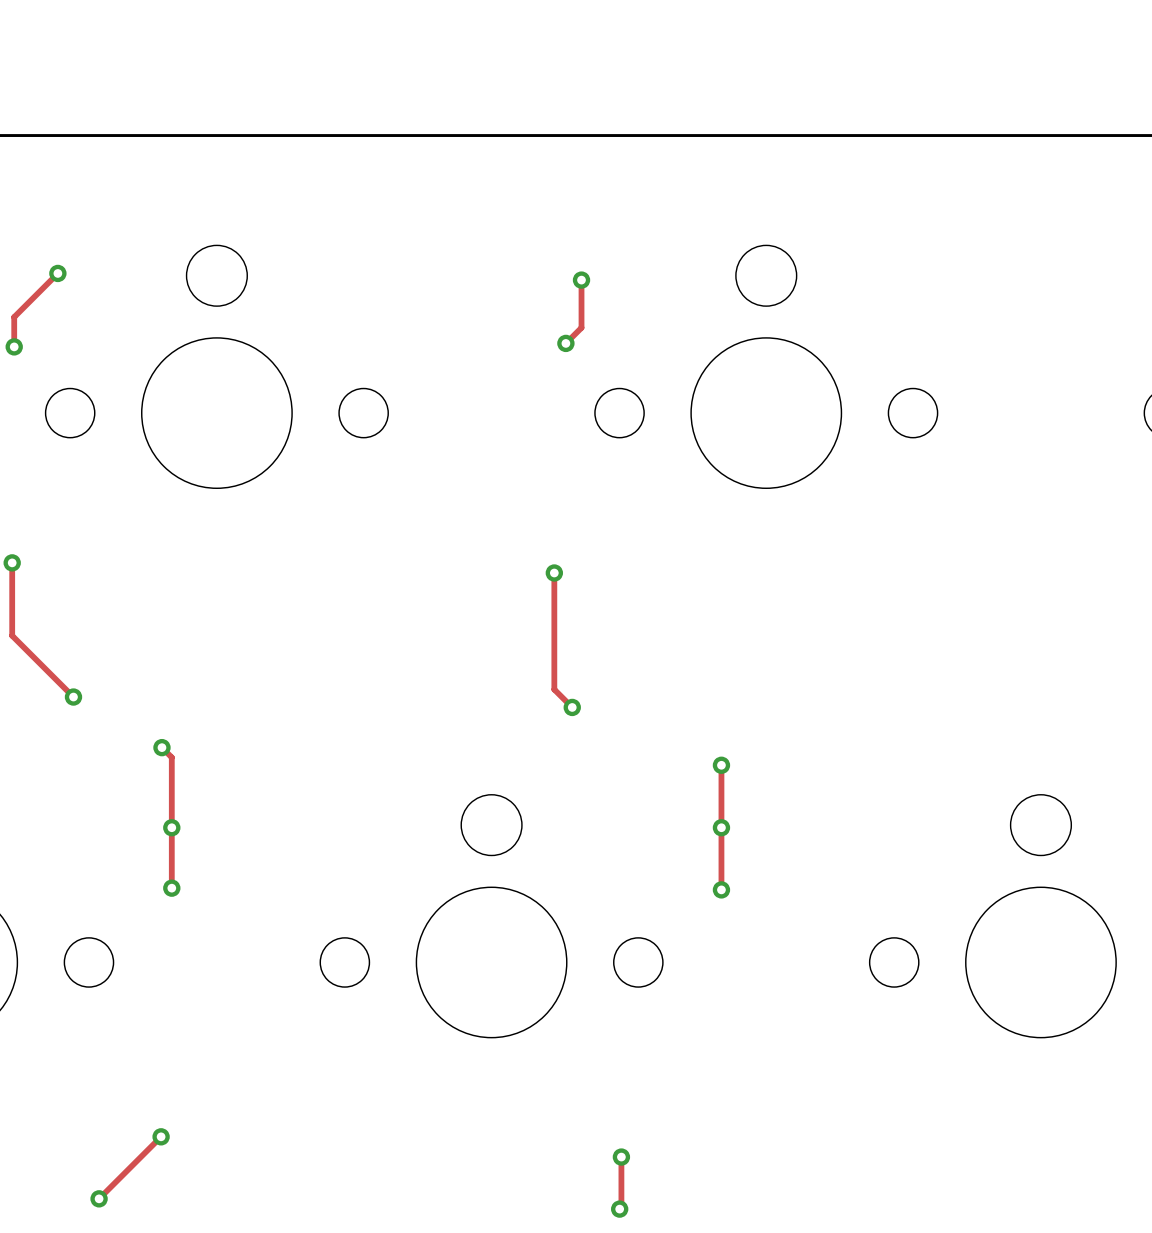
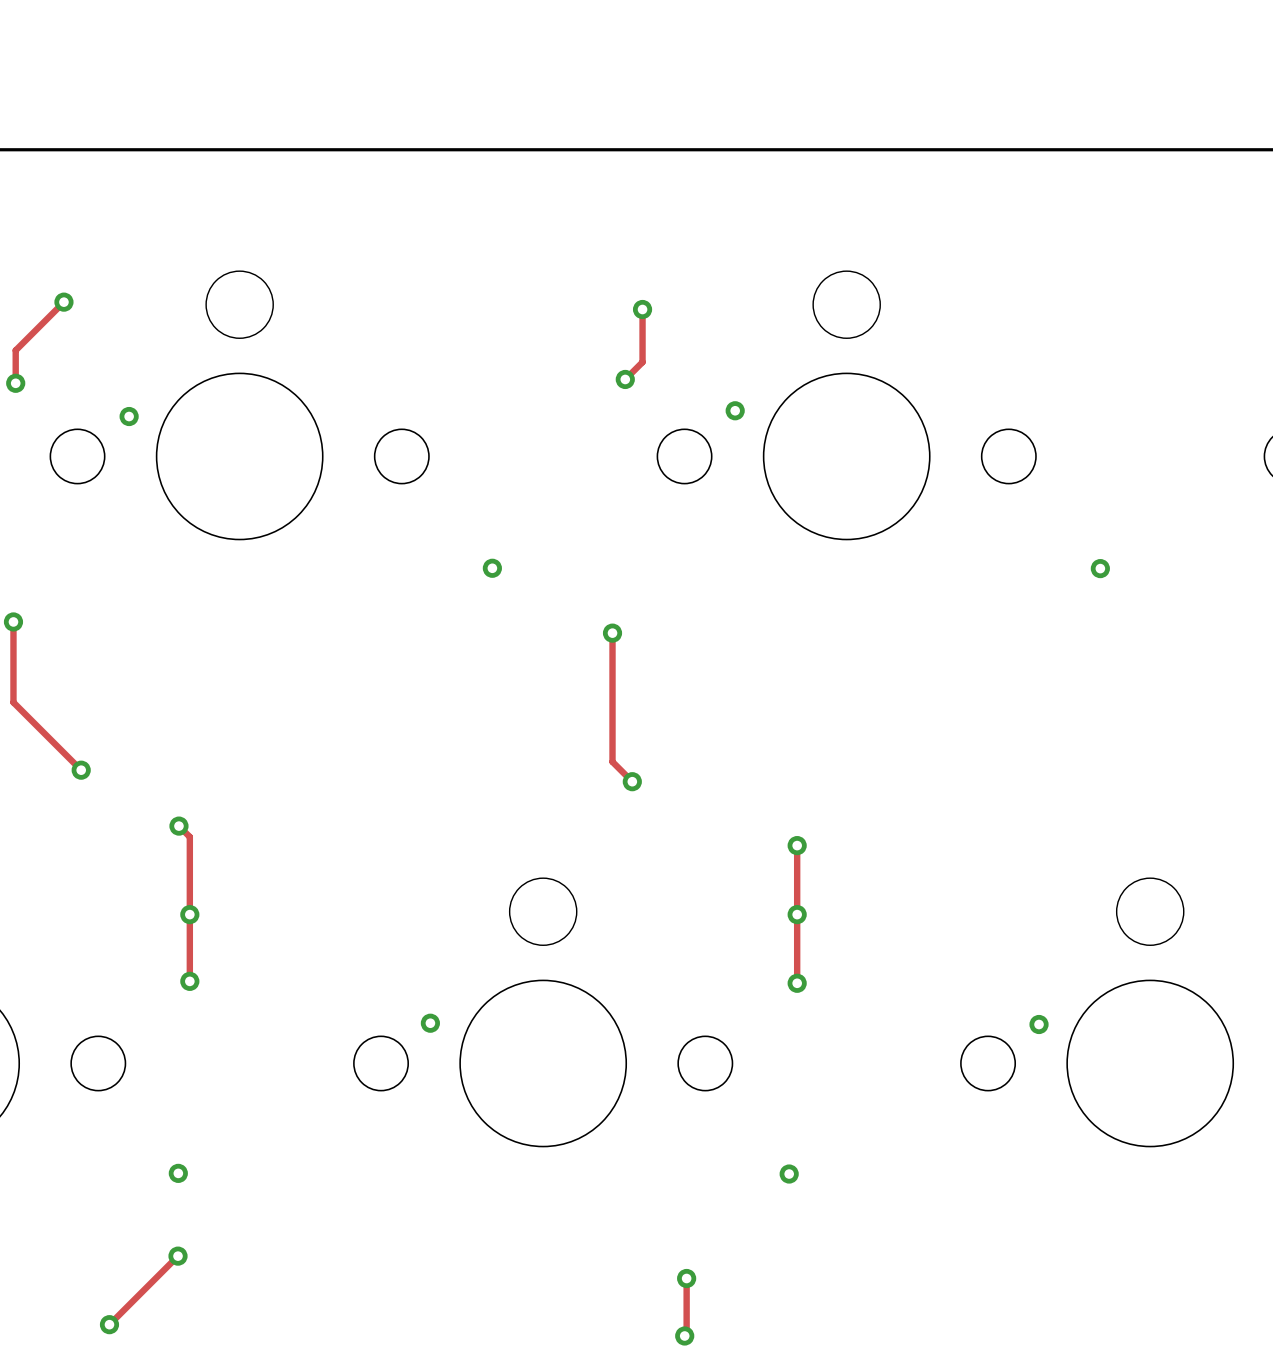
via: none -> (735, 410)
via: none -> (129, 416)
via: none -> (492, 568)
via: none -> (1100, 568)
via: none -> (430, 1023)
via: none -> (1039, 1024)
via: none -> (178, 1173)
via: none -> (789, 1174)

